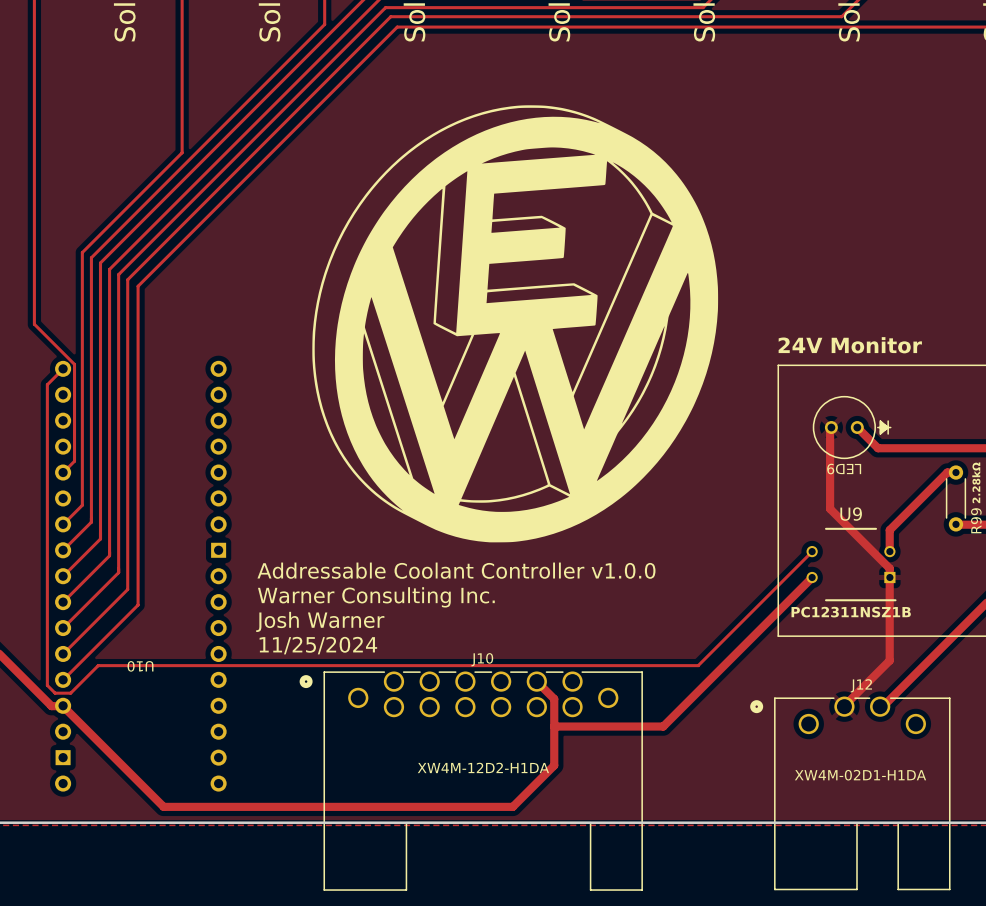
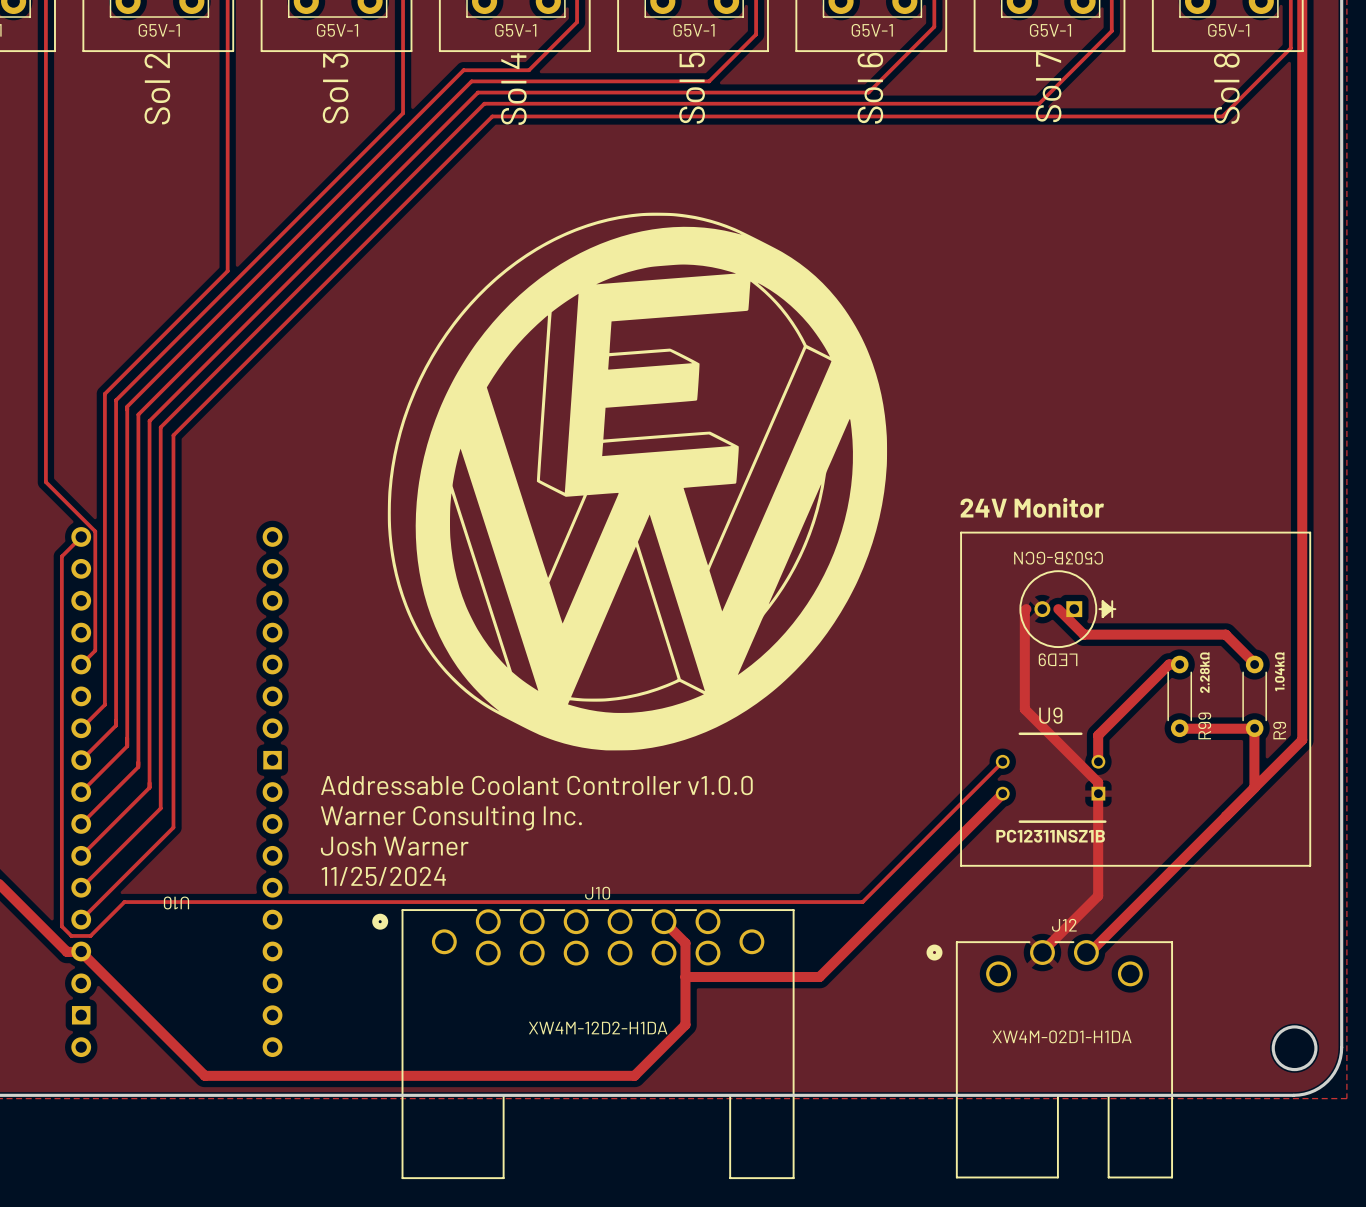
LED9 value: none -> C503B-GCN (1058, 558)
LED9 footprint: [812, 395, 892, 460] -> [1019, 570, 1117, 649]

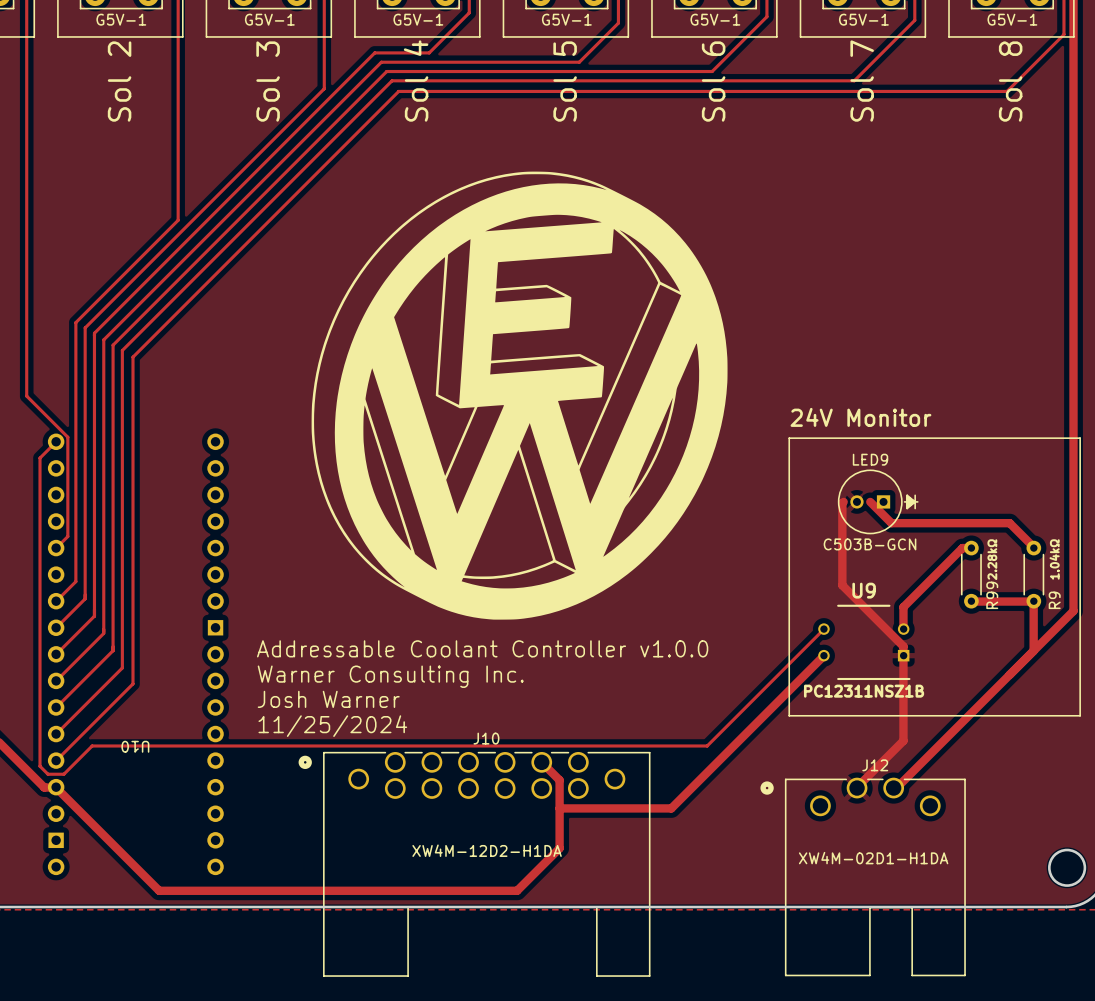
LED9 value rotation: 0° (1058, 558) -> 180° (870, 544)
LED9 name rotation: 0° (1058, 659) -> 180° (870, 459)
LED9 name position: LED9 (1058, 659) -> LED9 (870, 459)

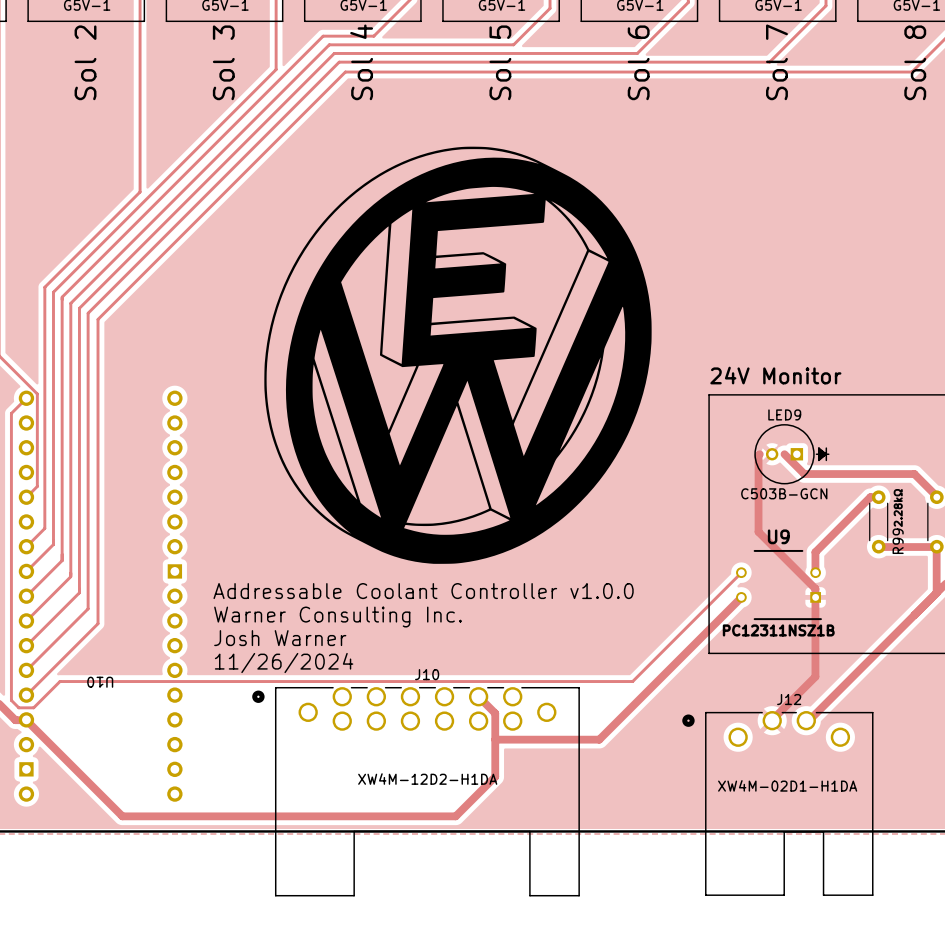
text: 11/25/2024 (332, 726) -> 11/26/2024 (284, 663)

